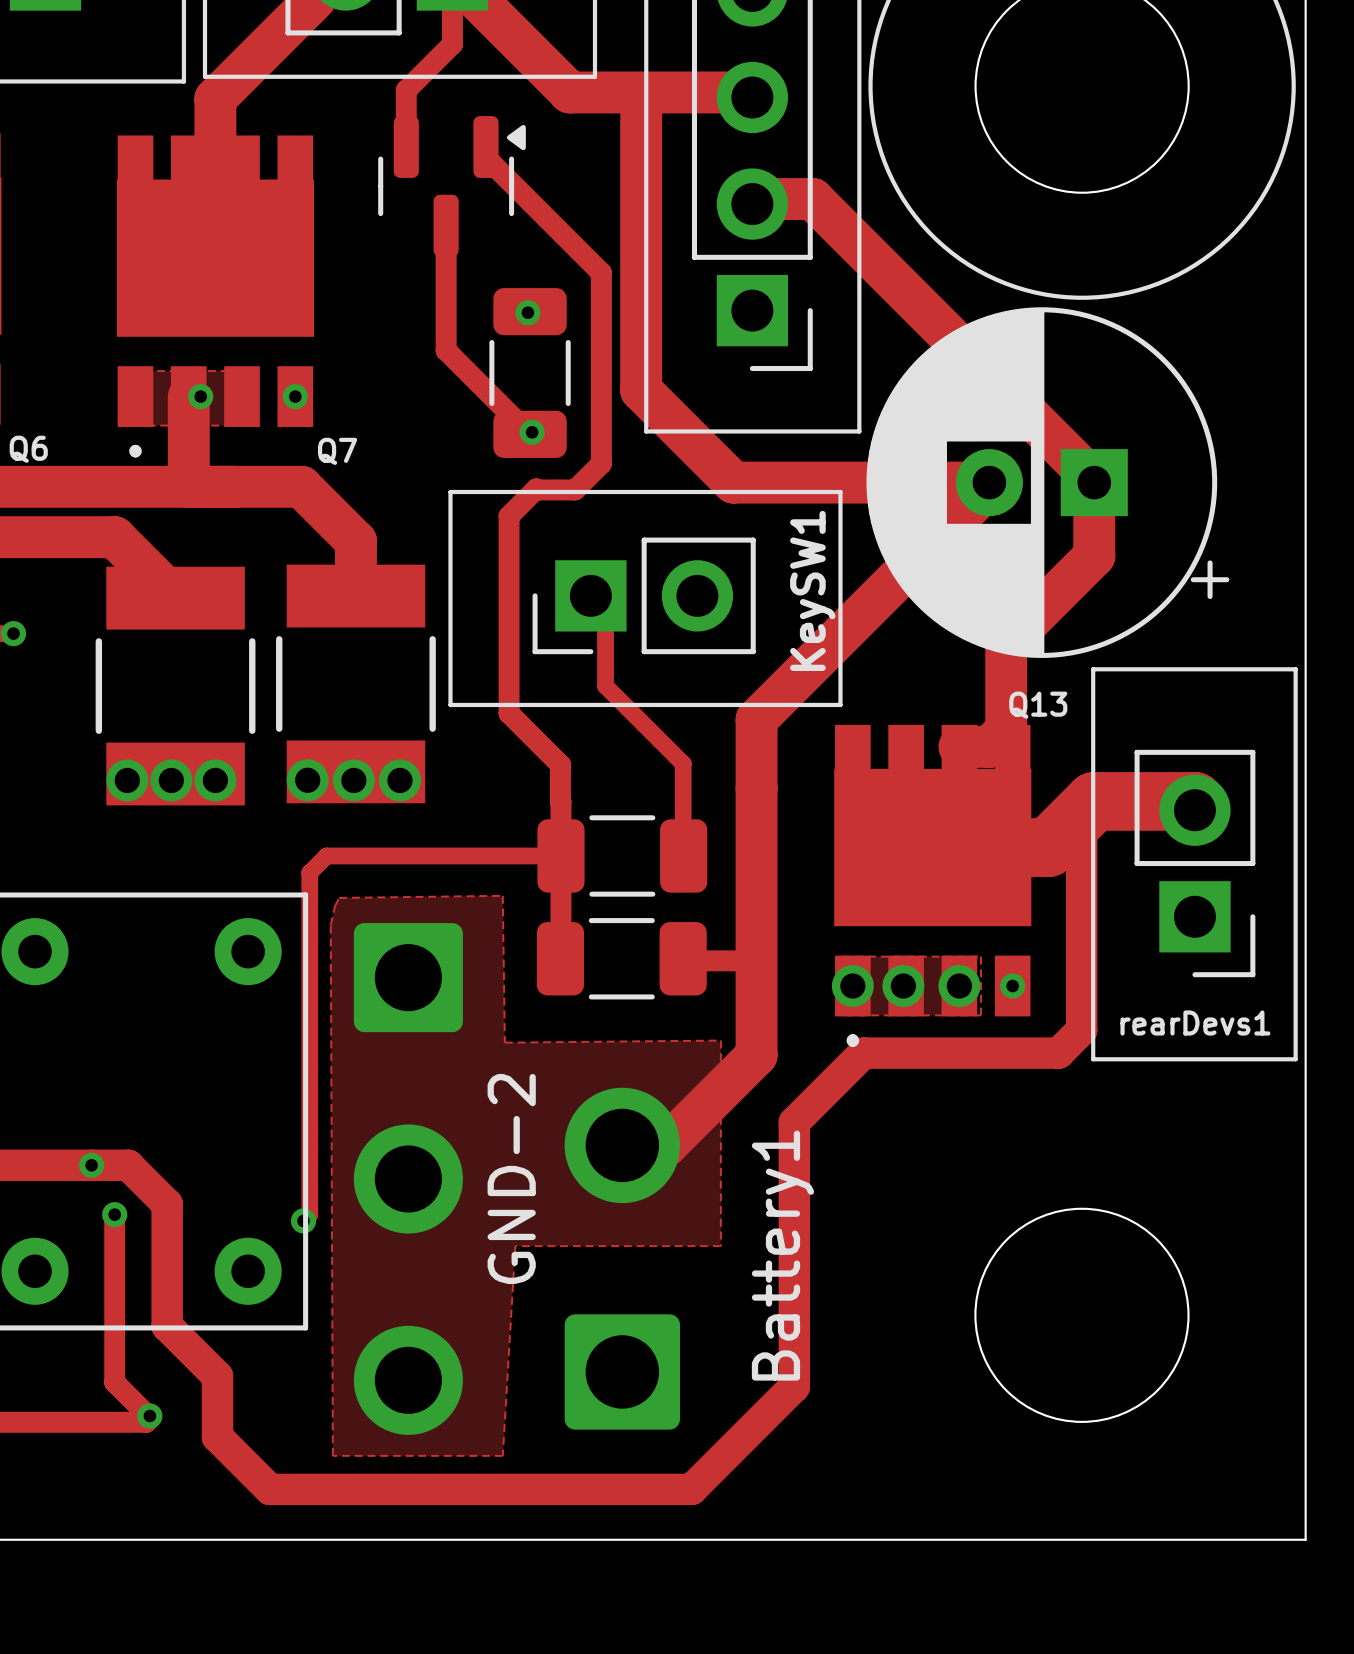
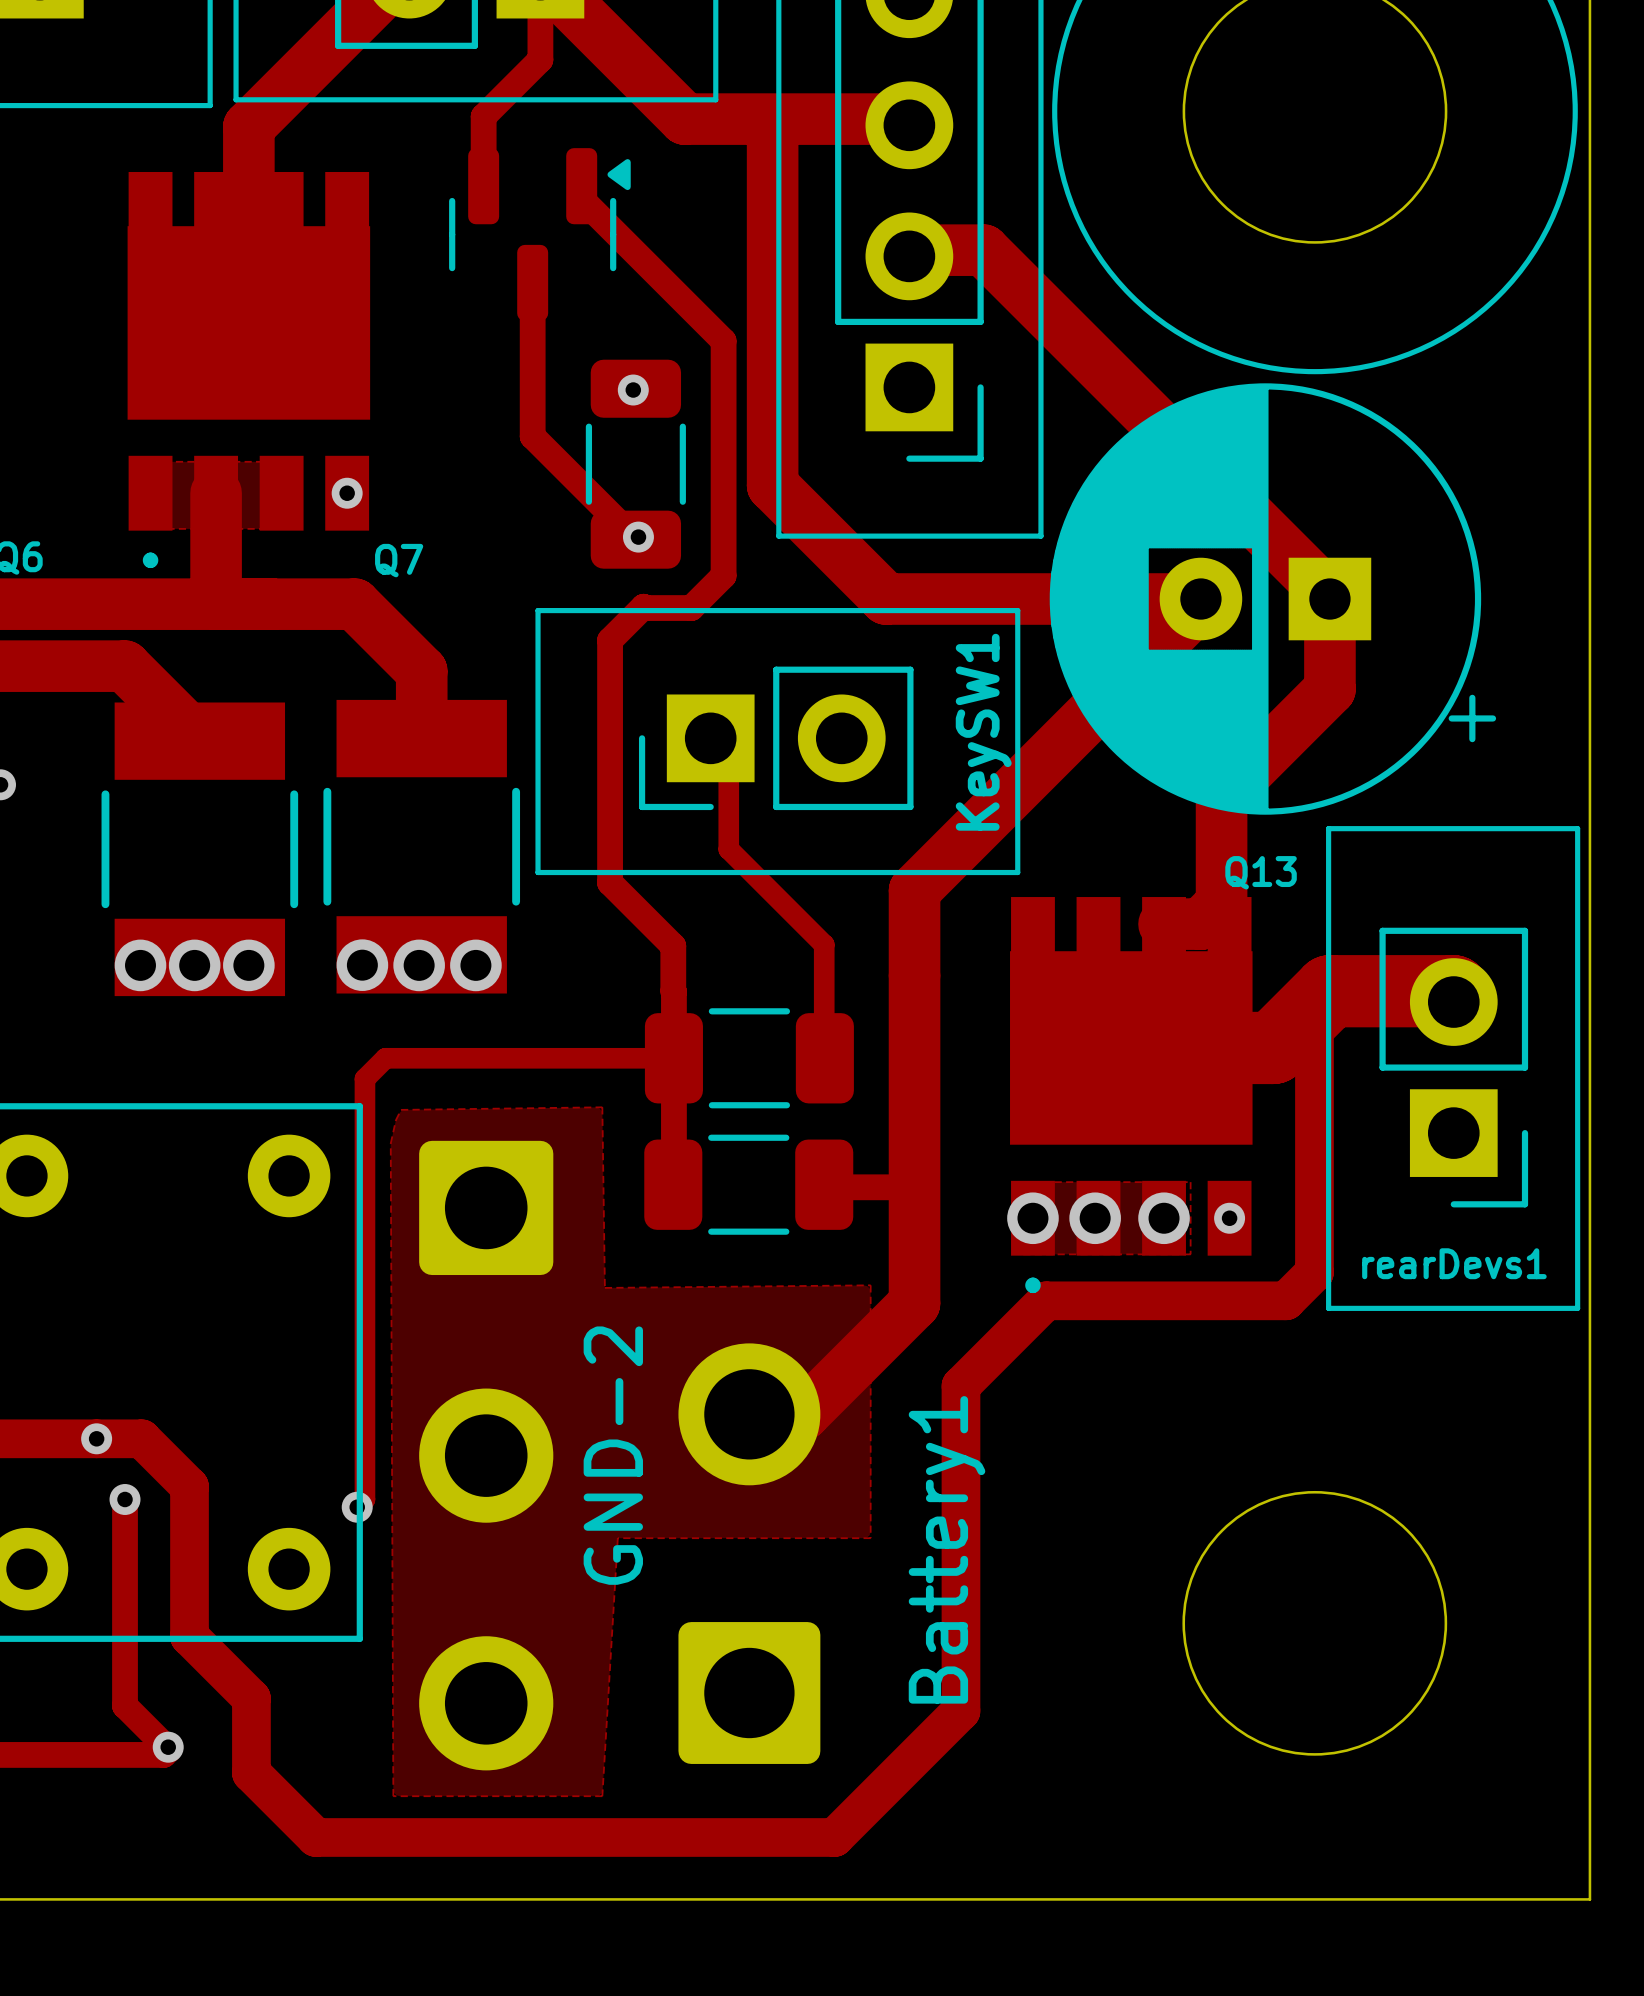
via: (200, 396) -> none

